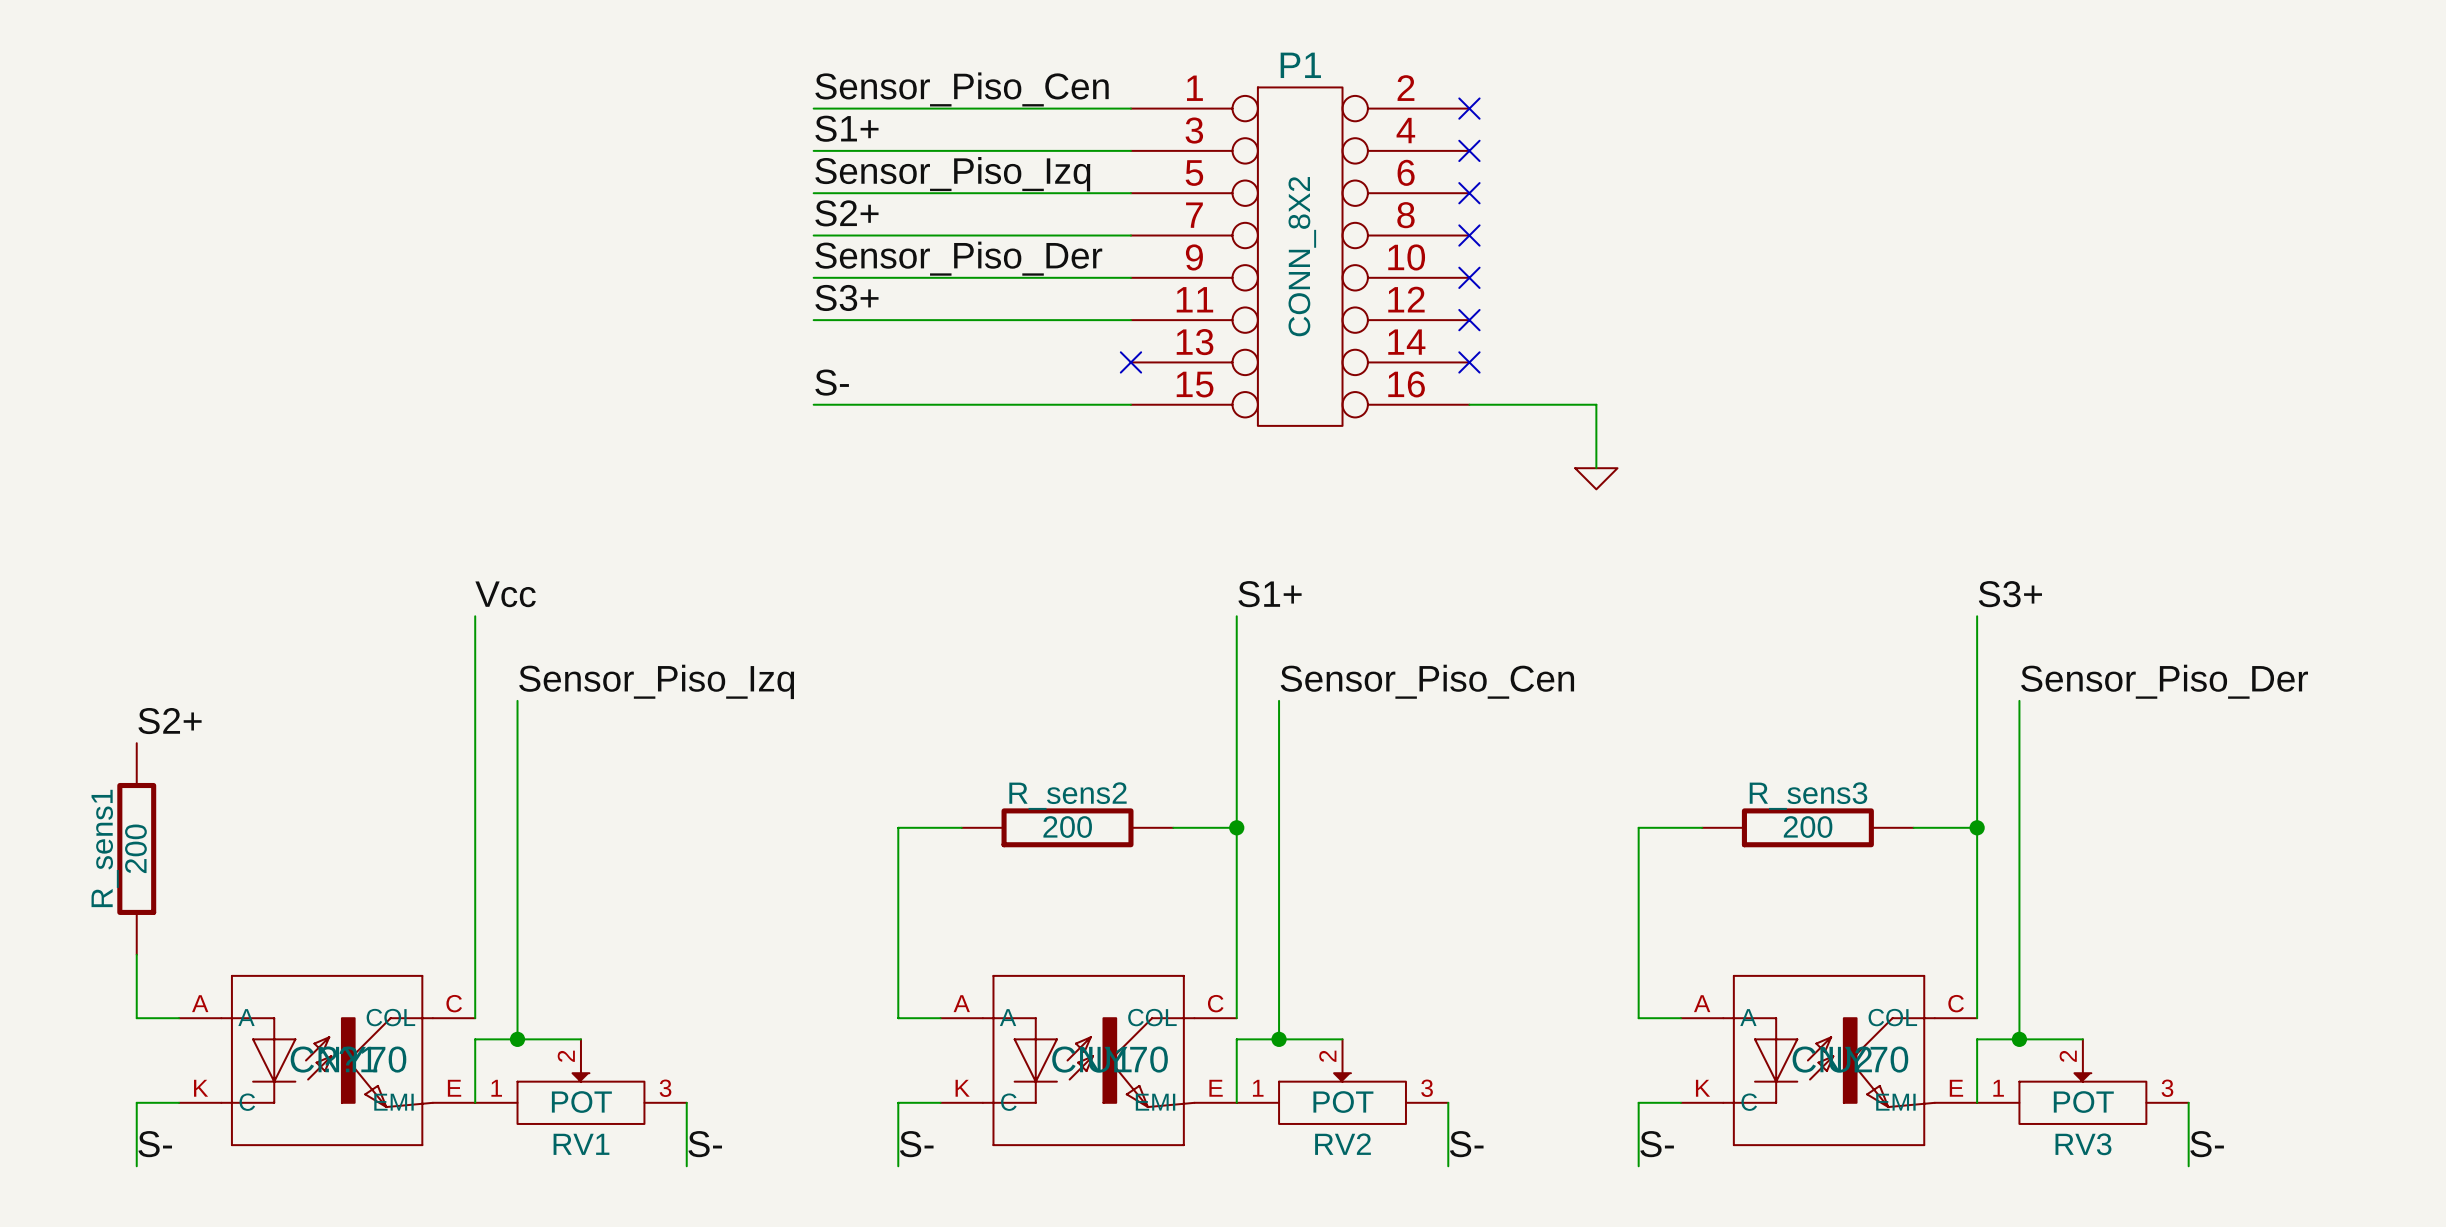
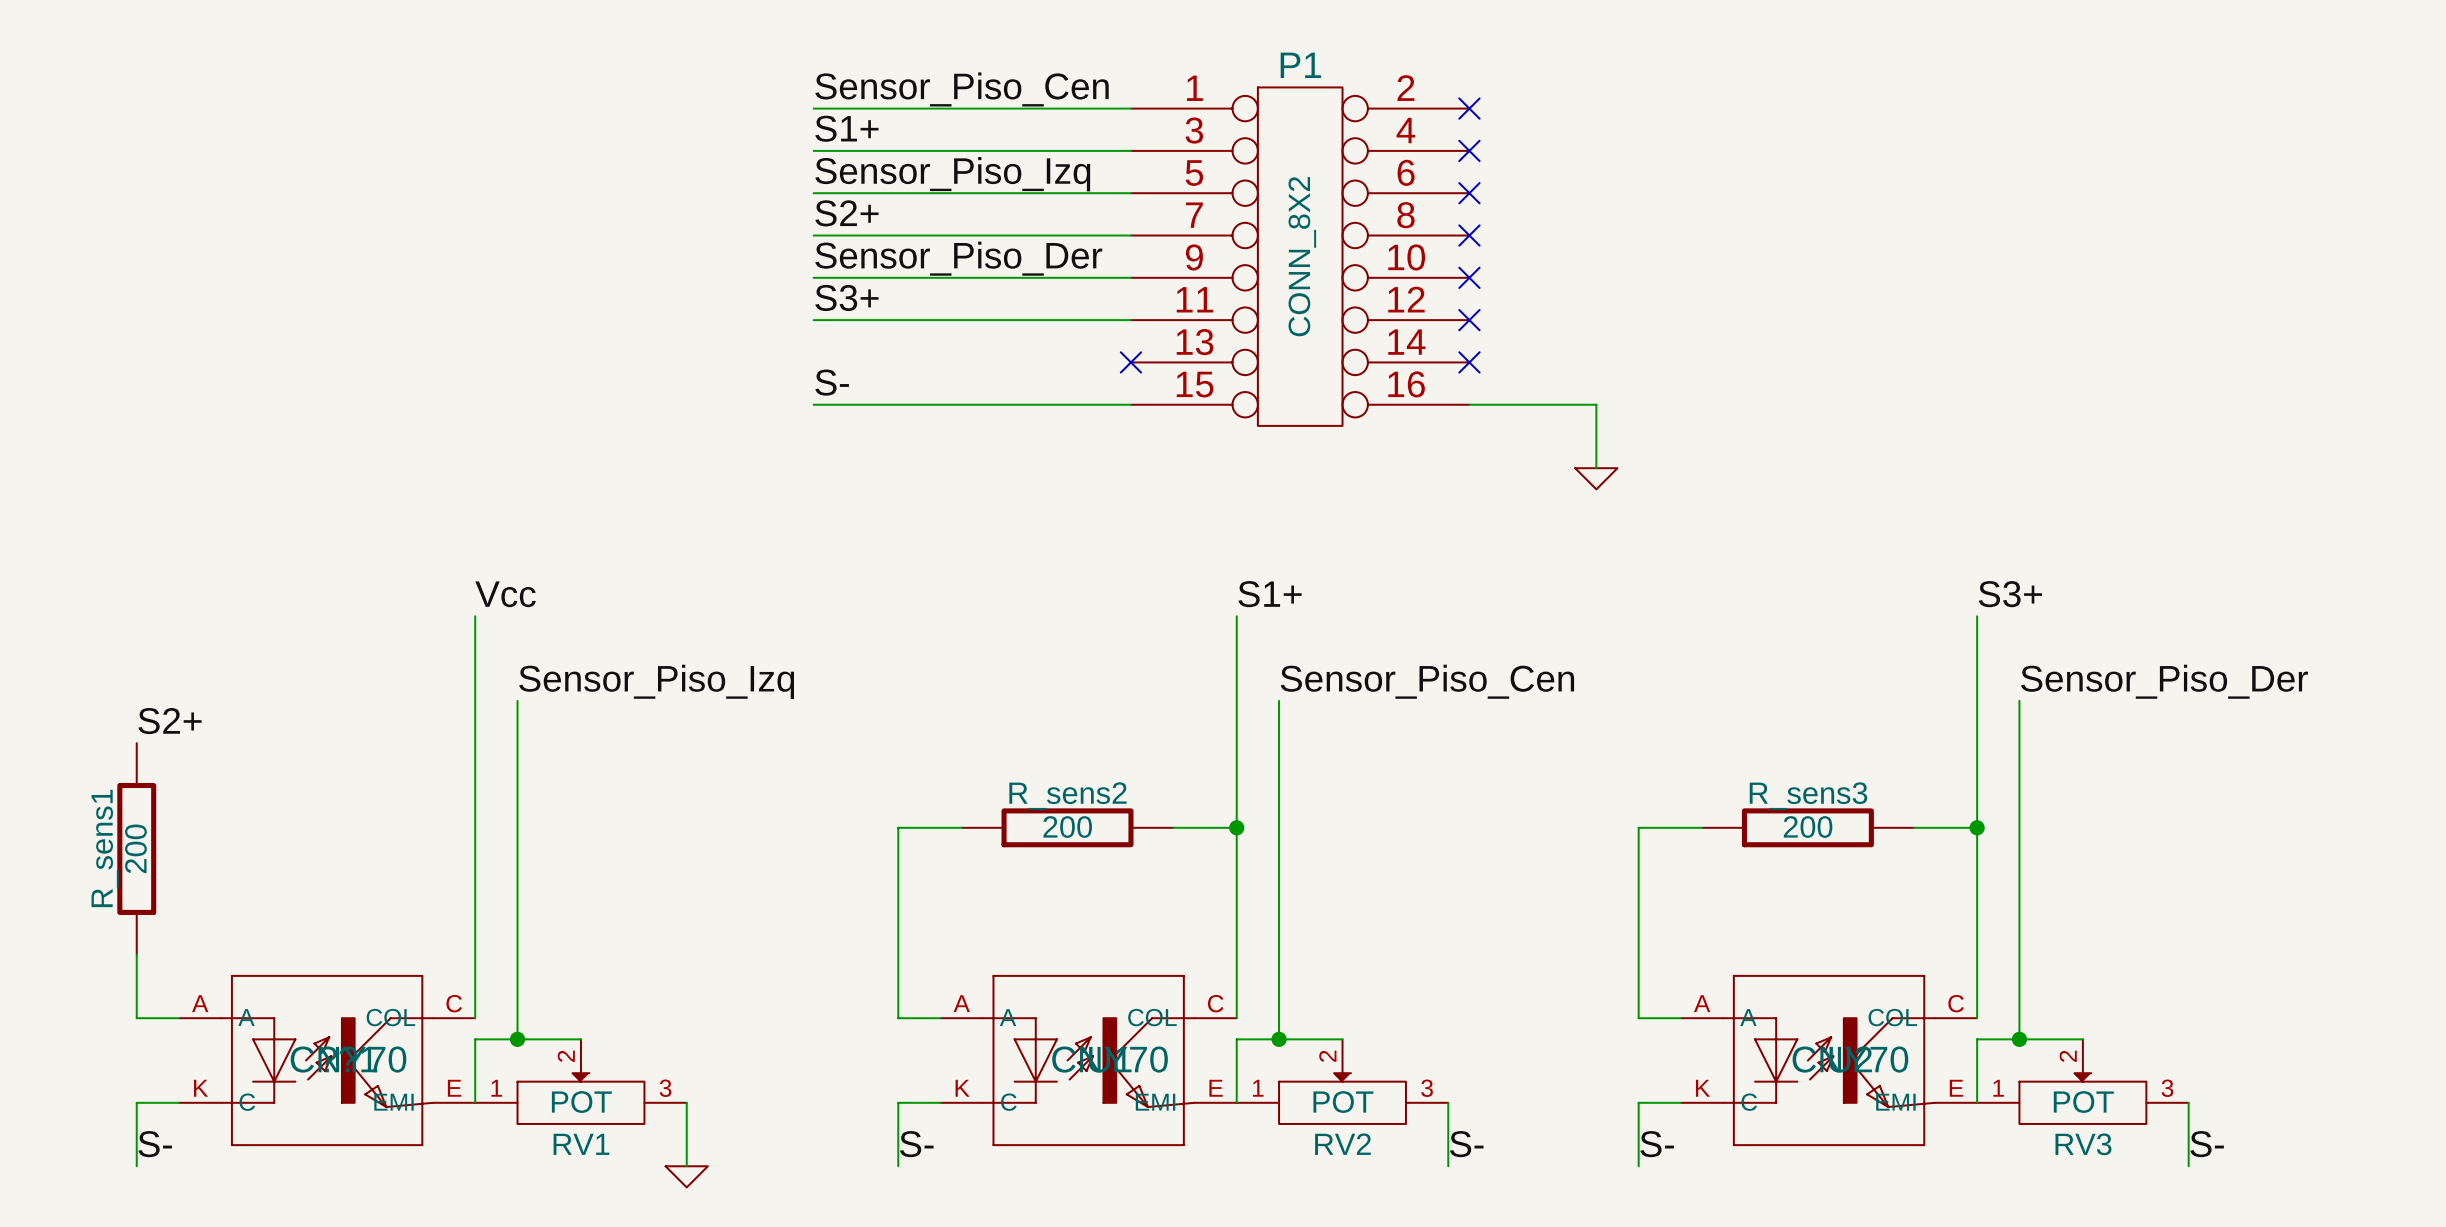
label: S- (705, 1144) -> none
power symbol: none -> (686, 1176)

